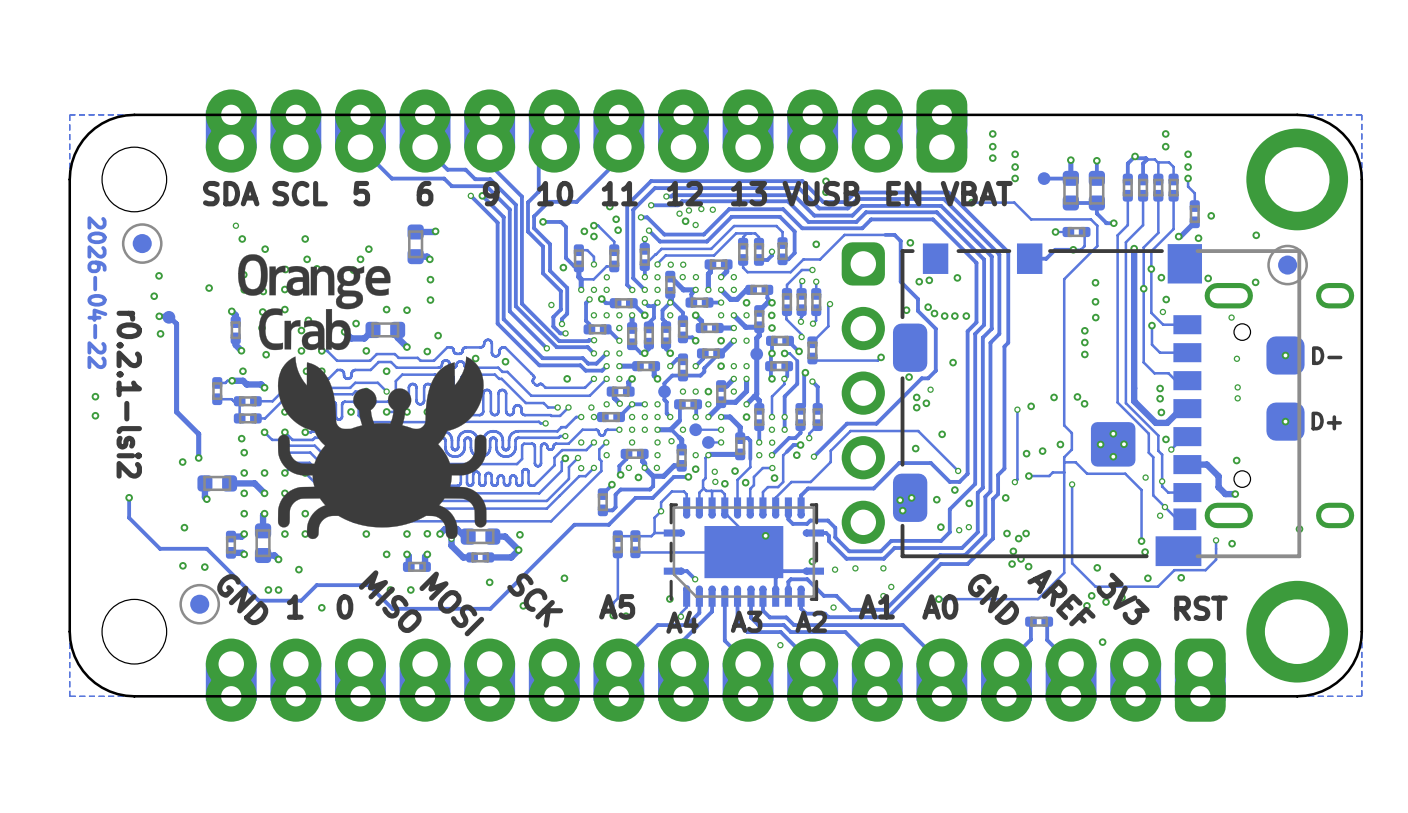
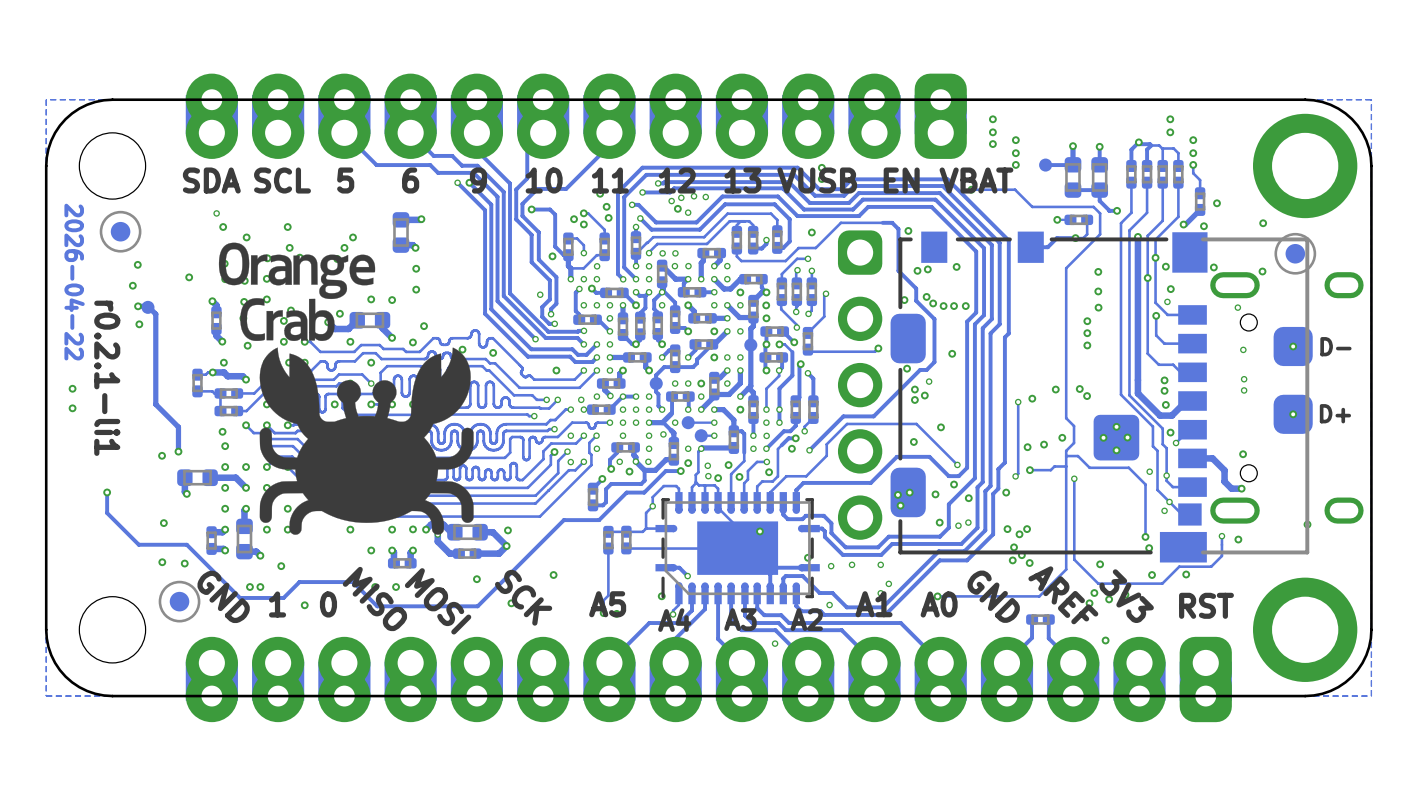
text: r0.2.1-lsi2 (129, 394) -> r0.2.1-li1 (107, 378)

